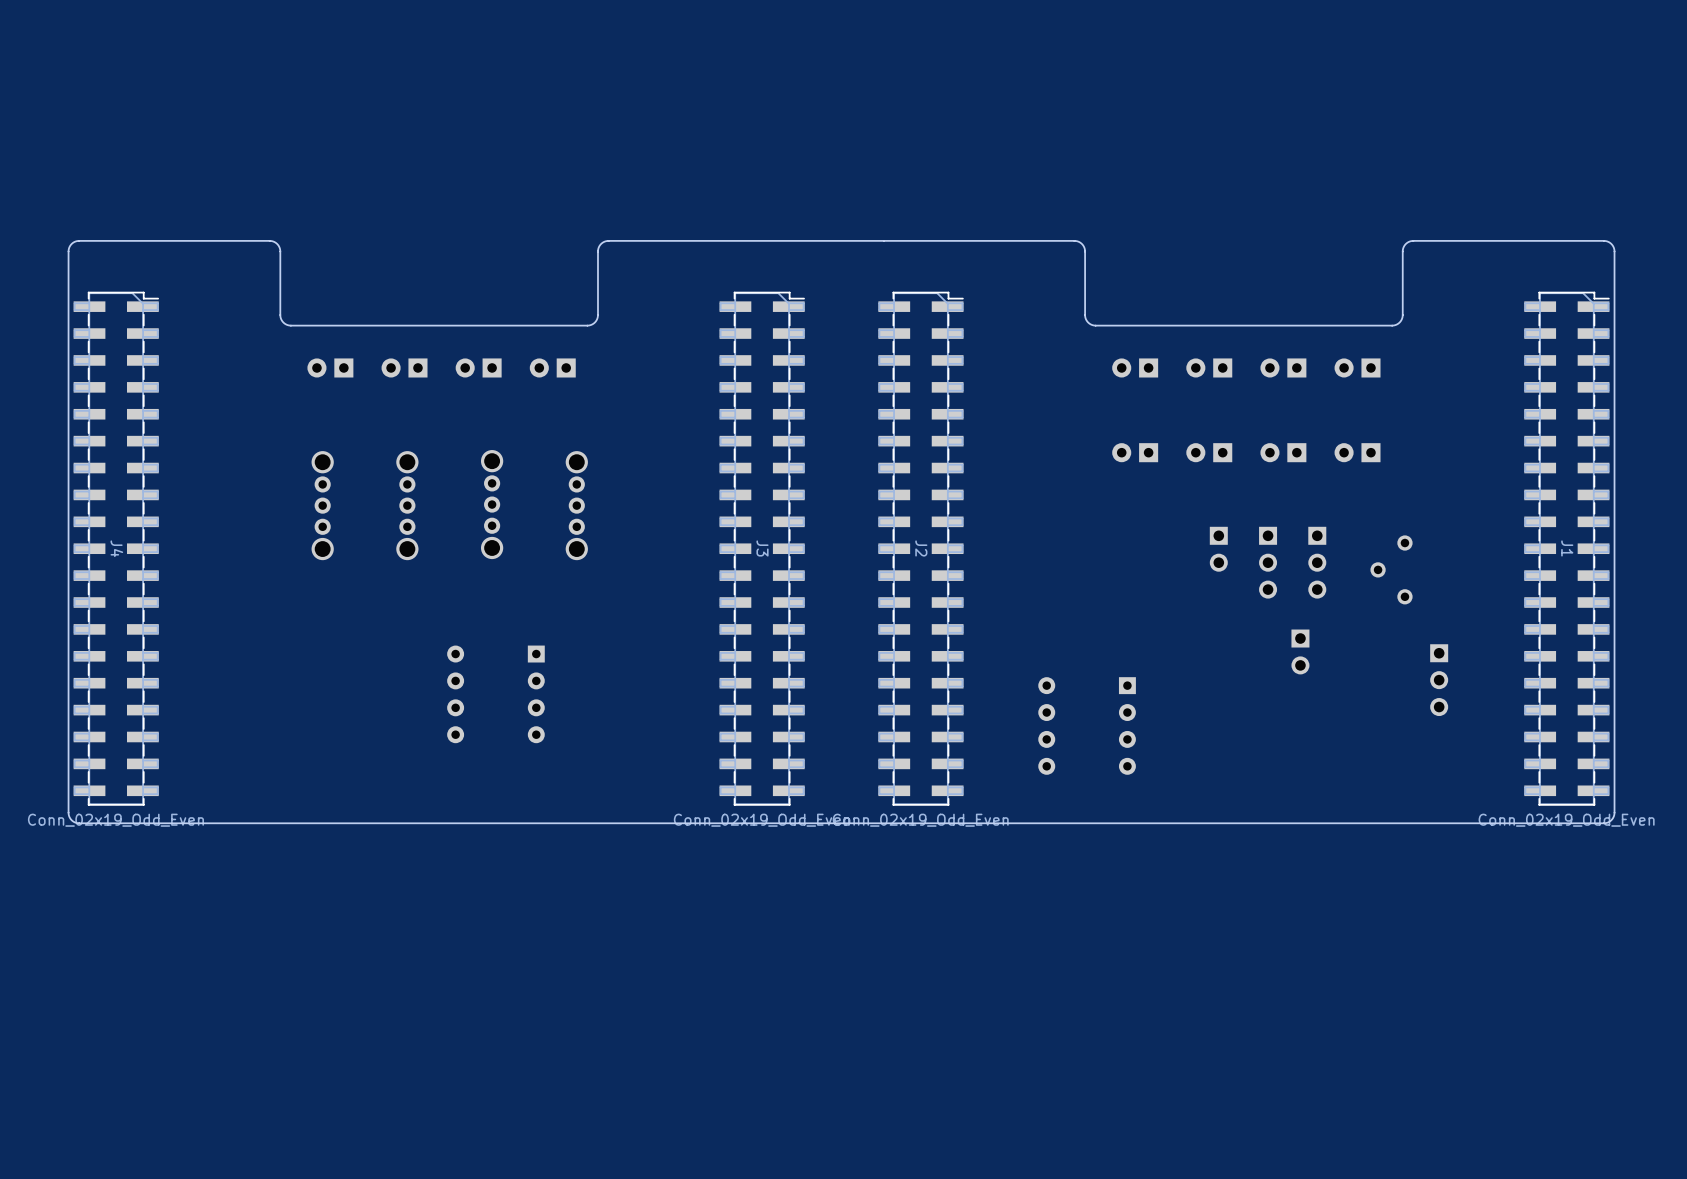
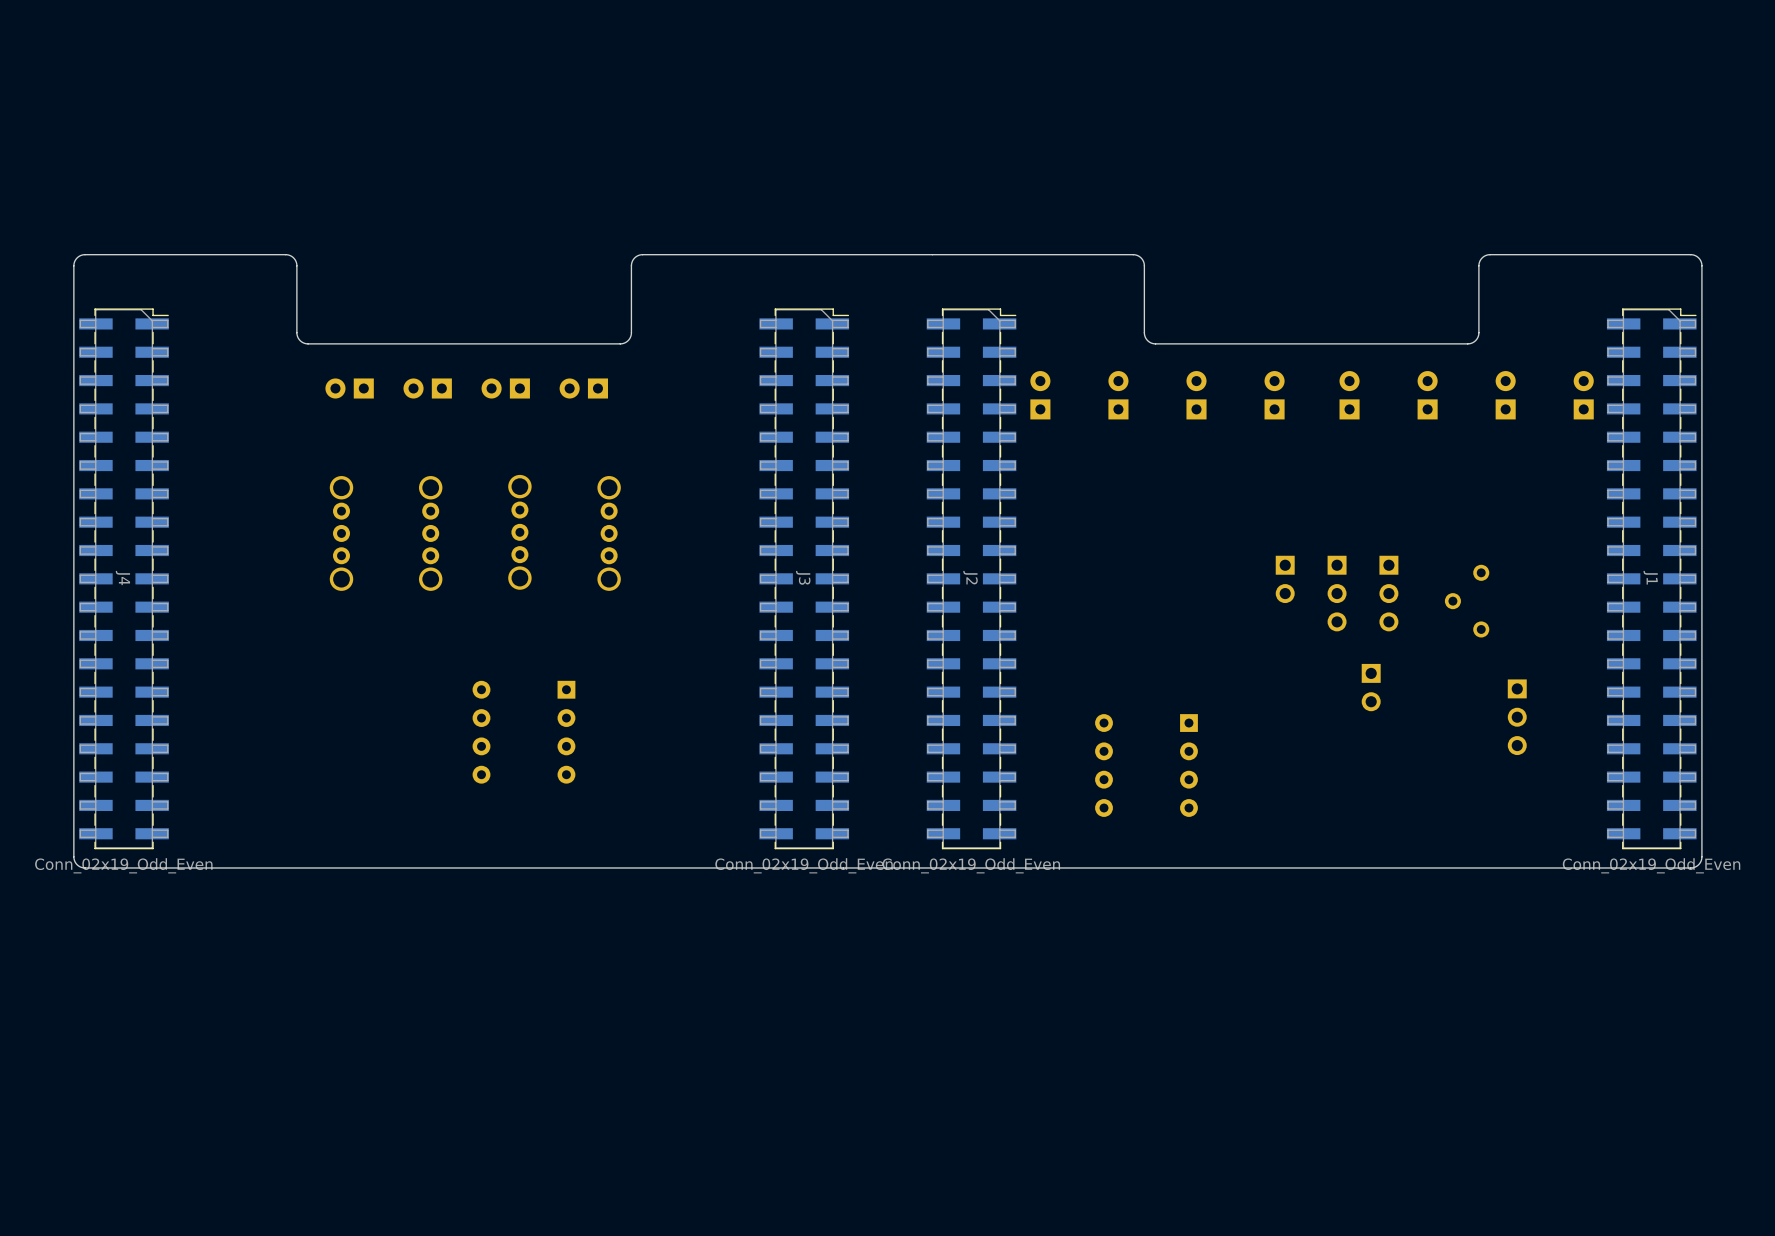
part rotation: 0° (1135, 367) -> 90° clockwise (1196, 395)
part rotation: 0° (1209, 367) -> 90° clockwise (1274, 395)
part rotation: 0° (1283, 367) -> 90° clockwise (1349, 395)
part rotation: 0° (1357, 367) -> 90° clockwise (1427, 395)
part: none -> (1040, 395)
part: none -> (1118, 395)
part: none -> (1505, 395)
part: none -> (1583, 395)
part: (1135, 452) -> none
part: (1209, 452) -> none
part: (1283, 452) -> none
part: (1357, 452) -> none

